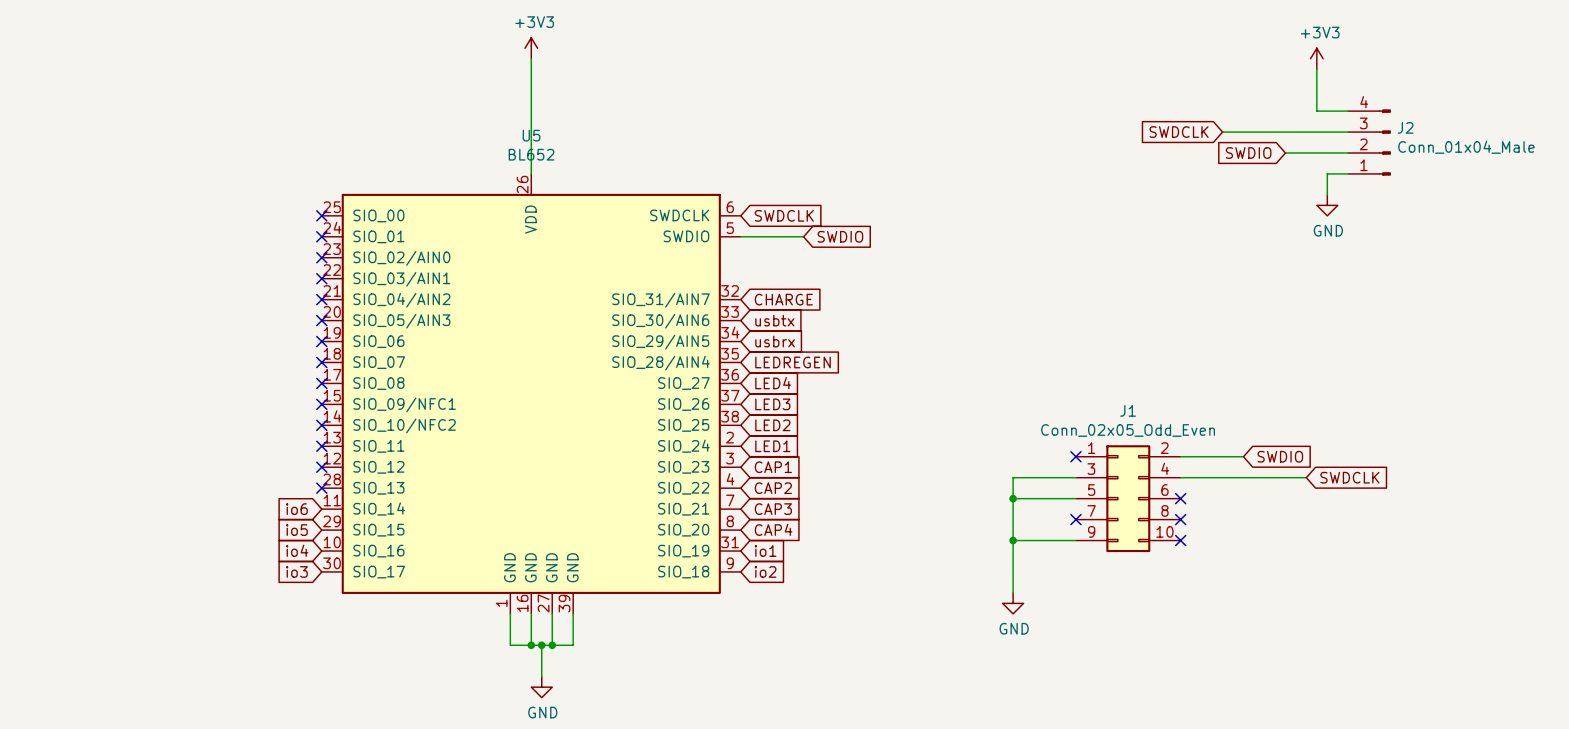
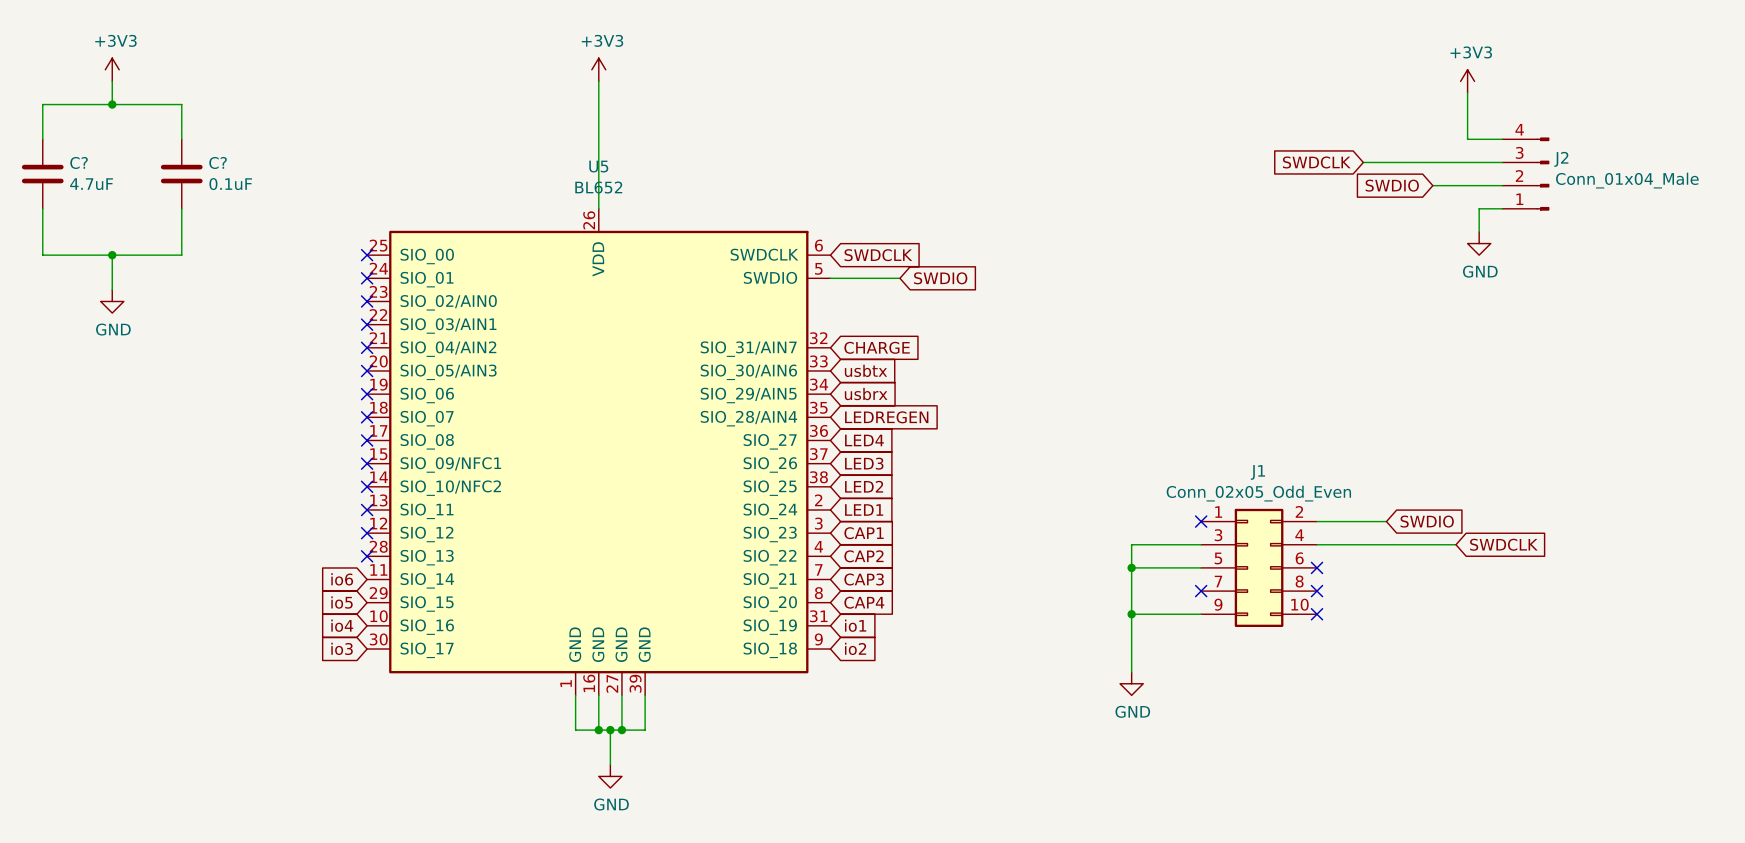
power symbol: none -> +3V3 (112, 69)
wire: none -> (112, 81) (112, 104)
junction: none -> (112, 104)
wire: none -> (42, 139) (42, 104) (181, 104) (181, 139)
C?: none -> 4.7uF (42, 174)
C?: none -> 0.1uF (181, 174)
wire: none -> (42, 208) (42, 255) (181, 255) (181, 208)
wire: none -> (112, 255) (112, 289)
junction: none -> (112, 255)
power symbol: none -> GND (112, 301)

